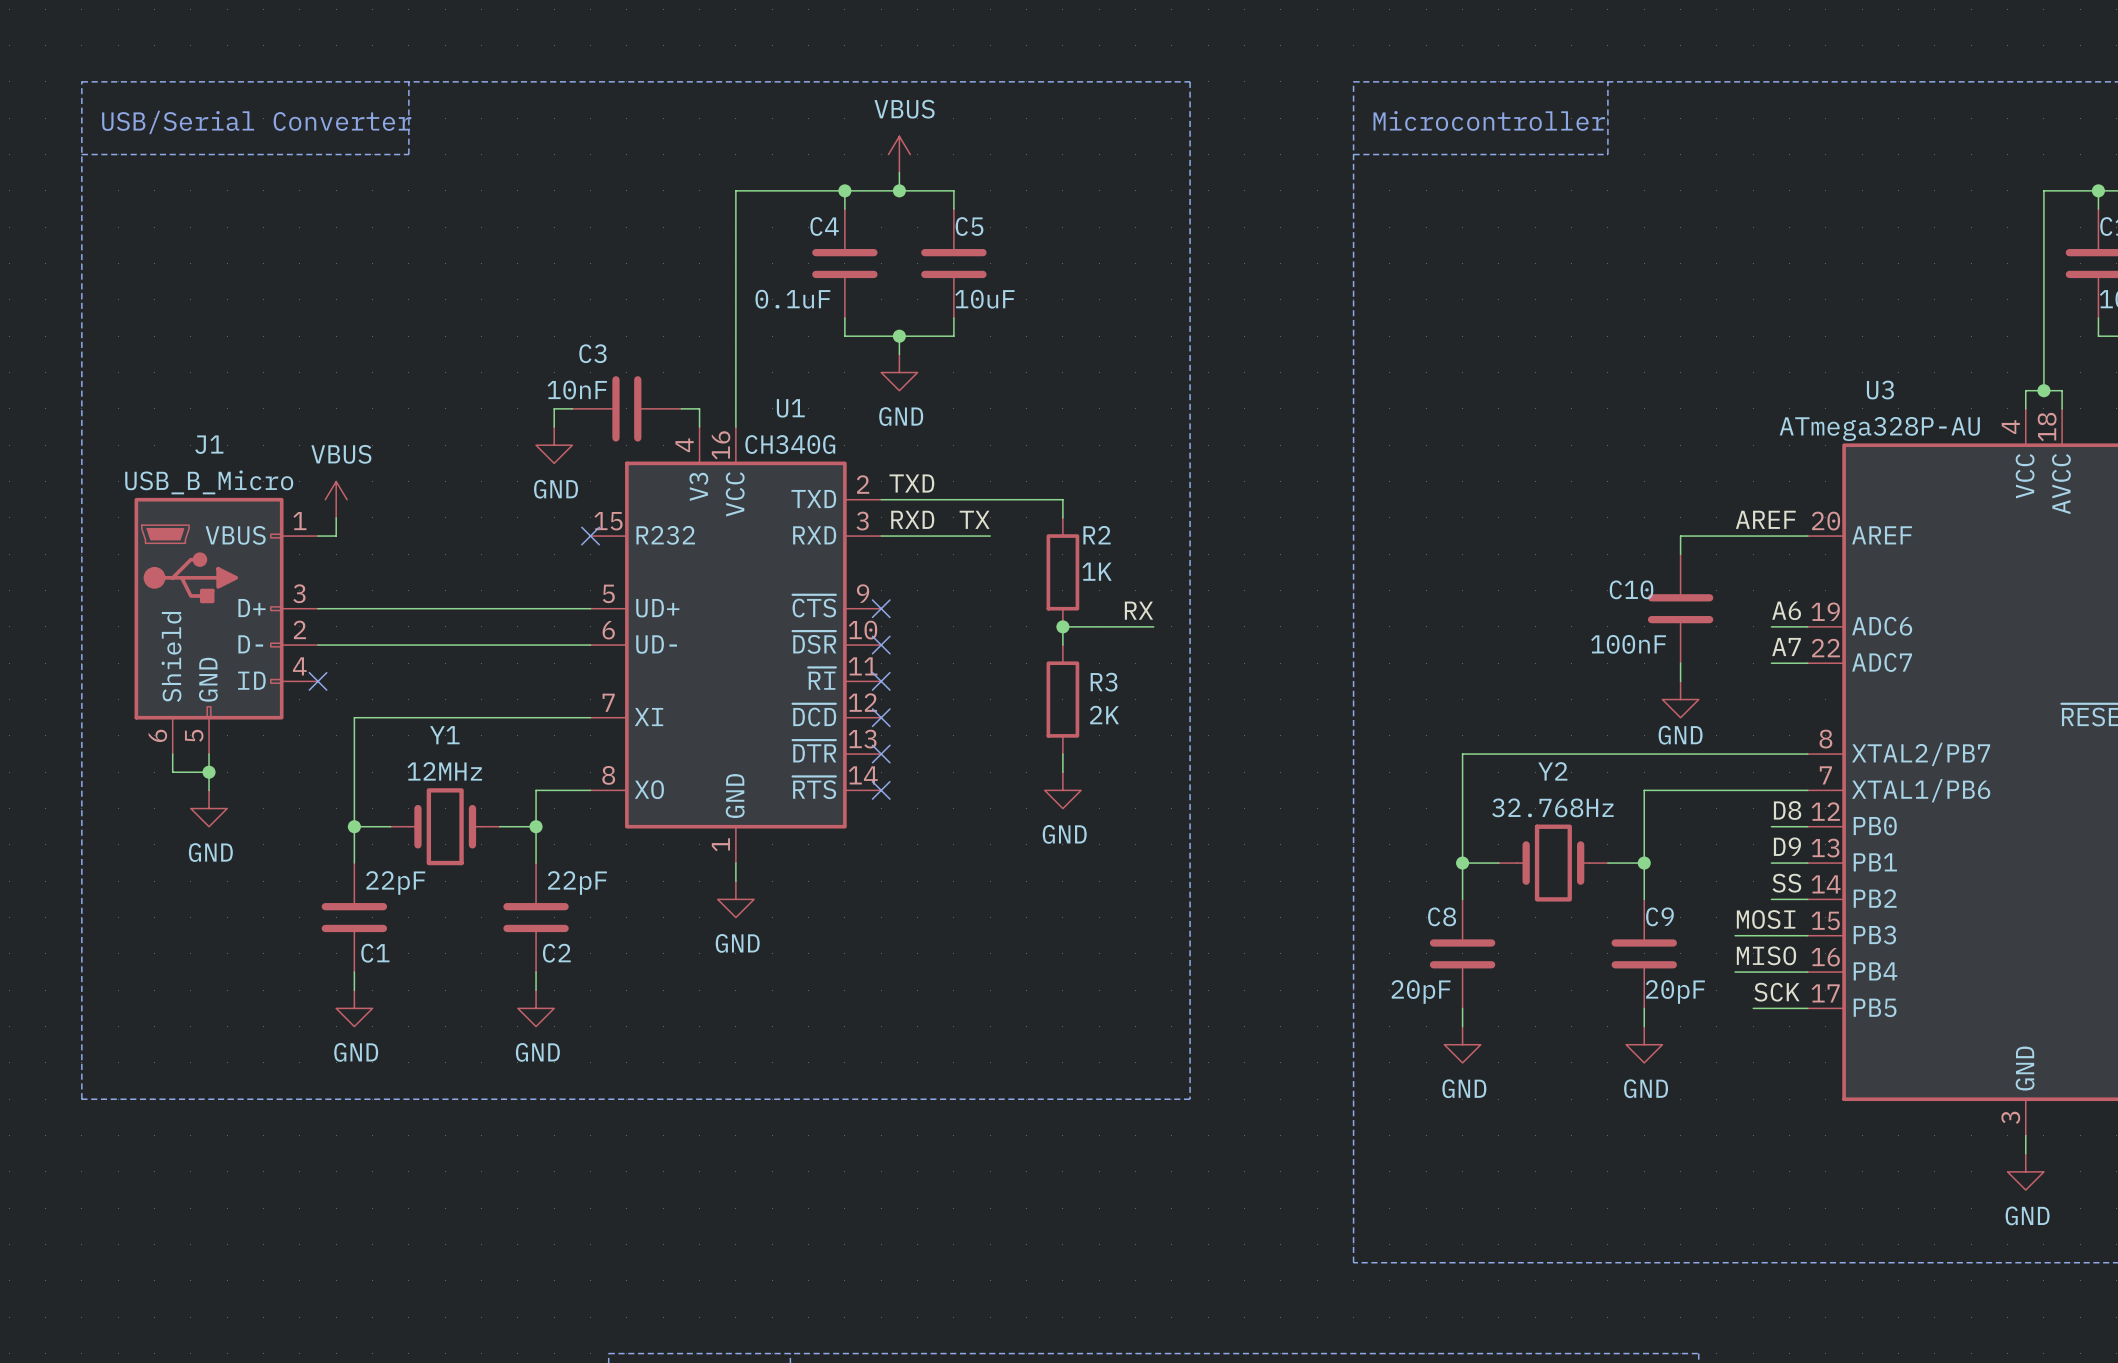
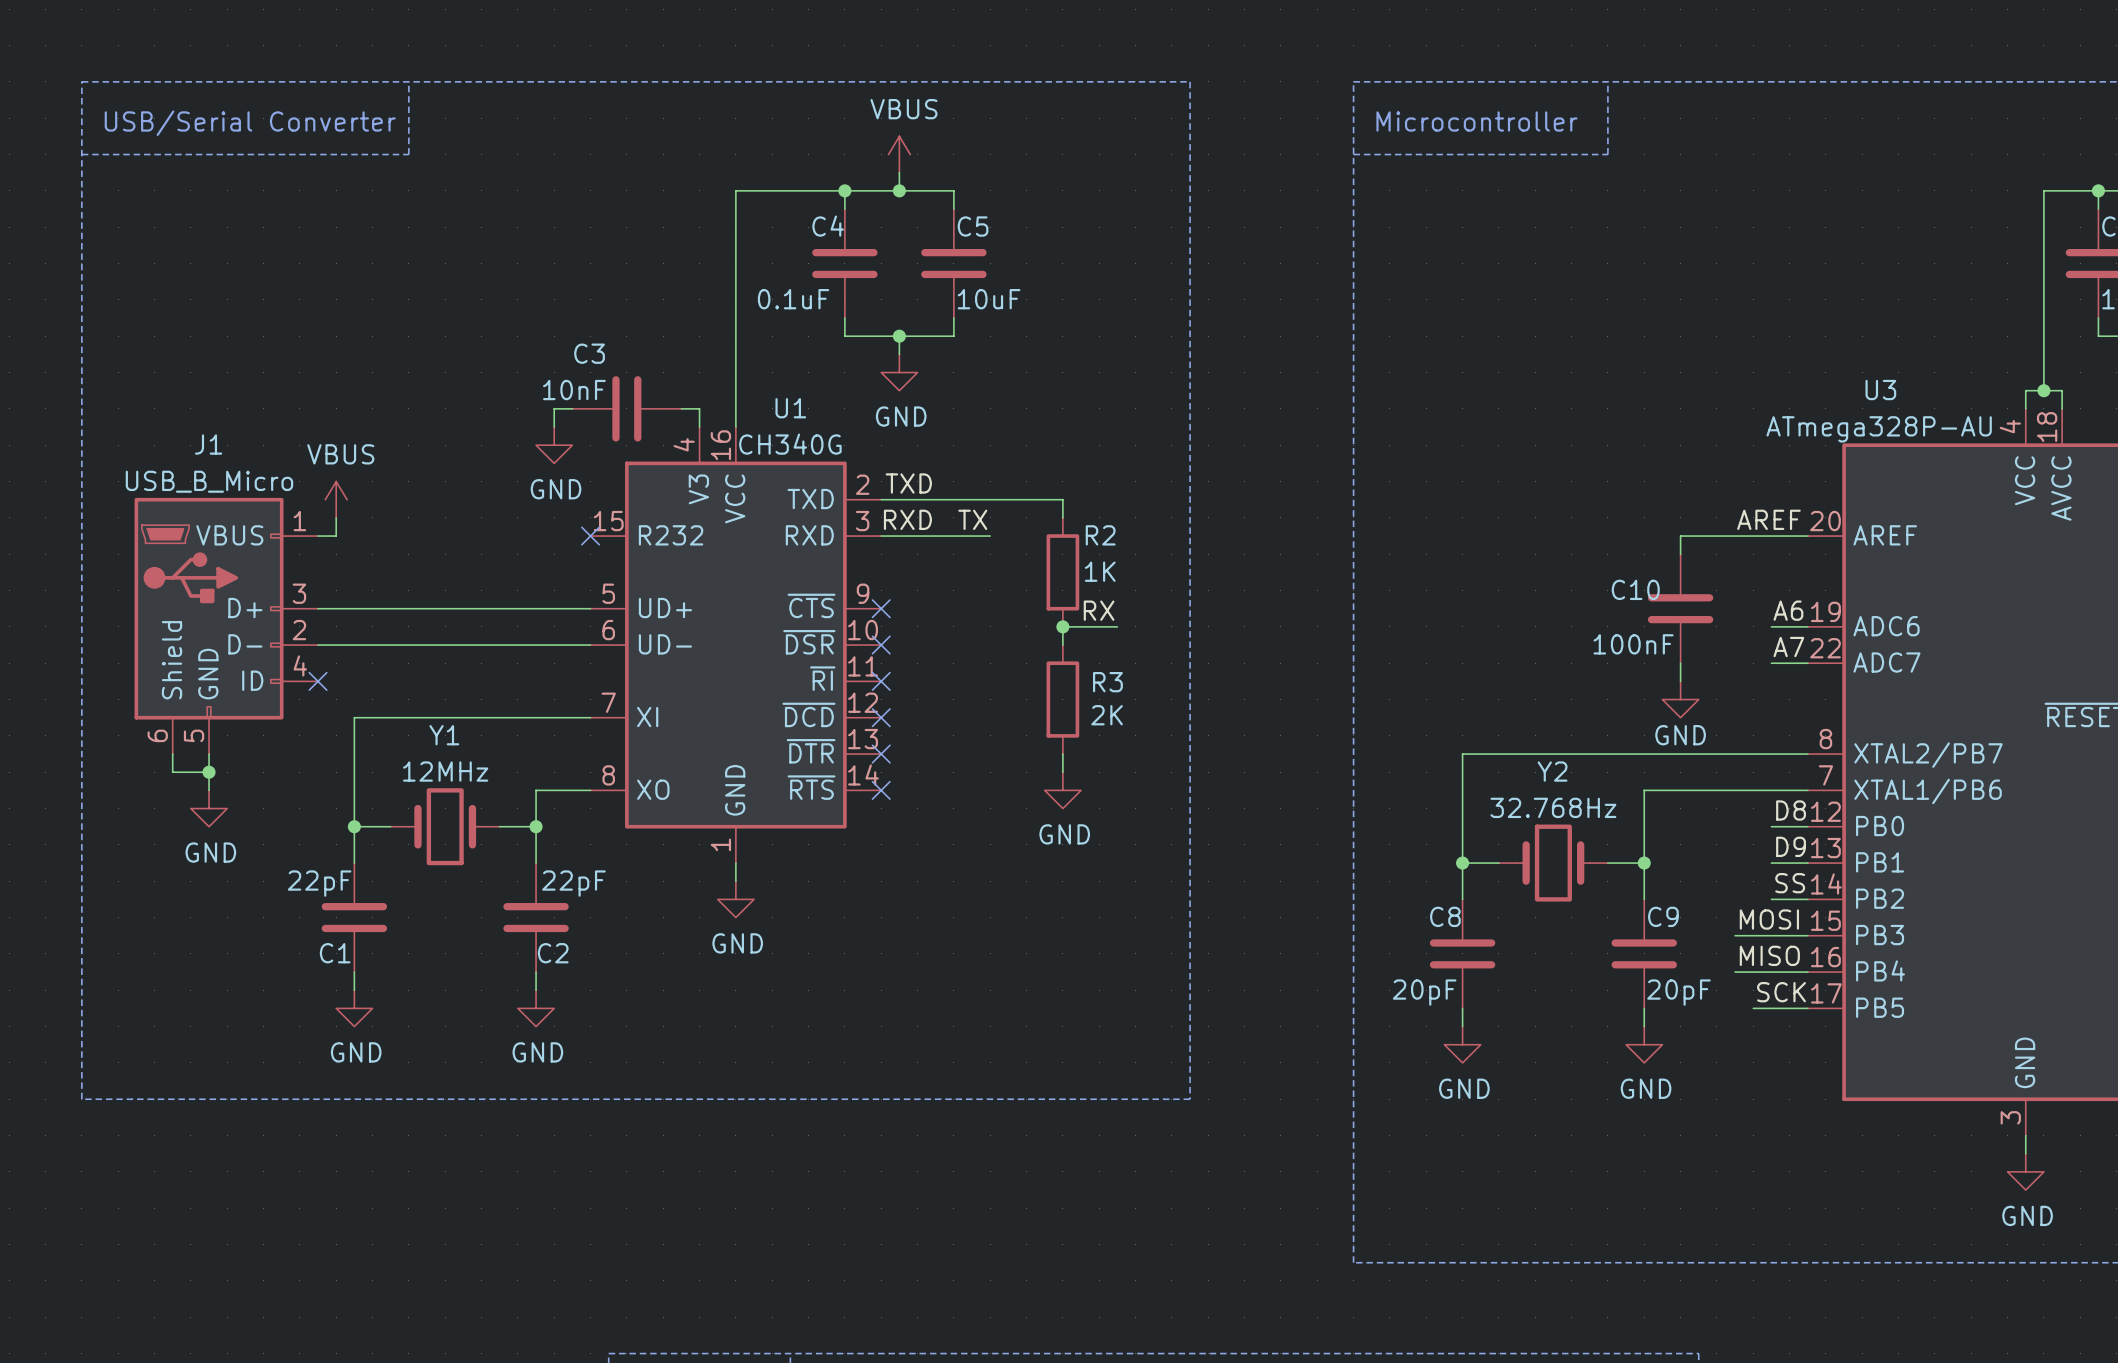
label position: RX (1138, 610) -> RX (1099, 610)
wire: (1117, 626) (1153, 626) -> none
C1 value position: 22pF (395, 882) -> 22pF (319, 883)
C1 name position: C1 (375, 953) -> C1 (335, 953)

